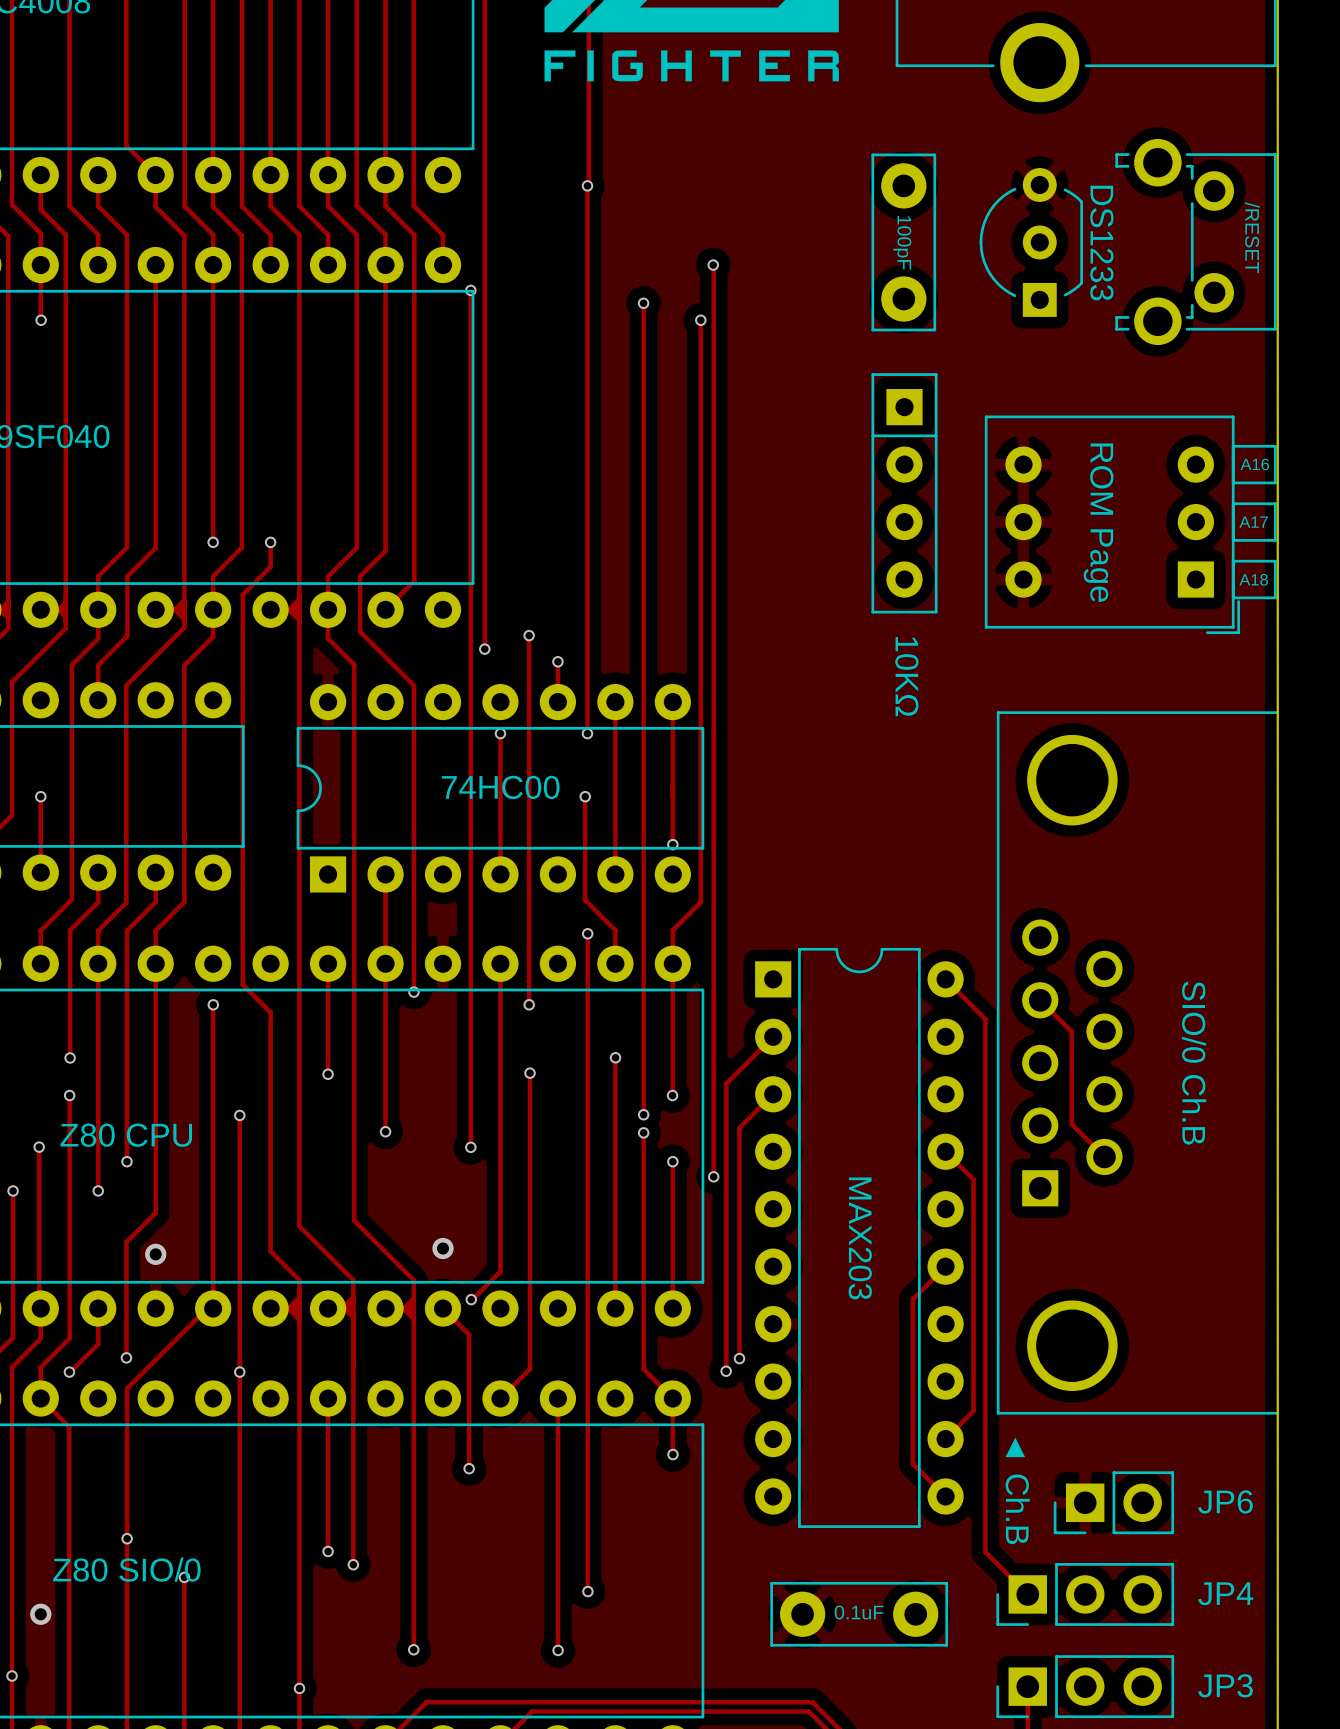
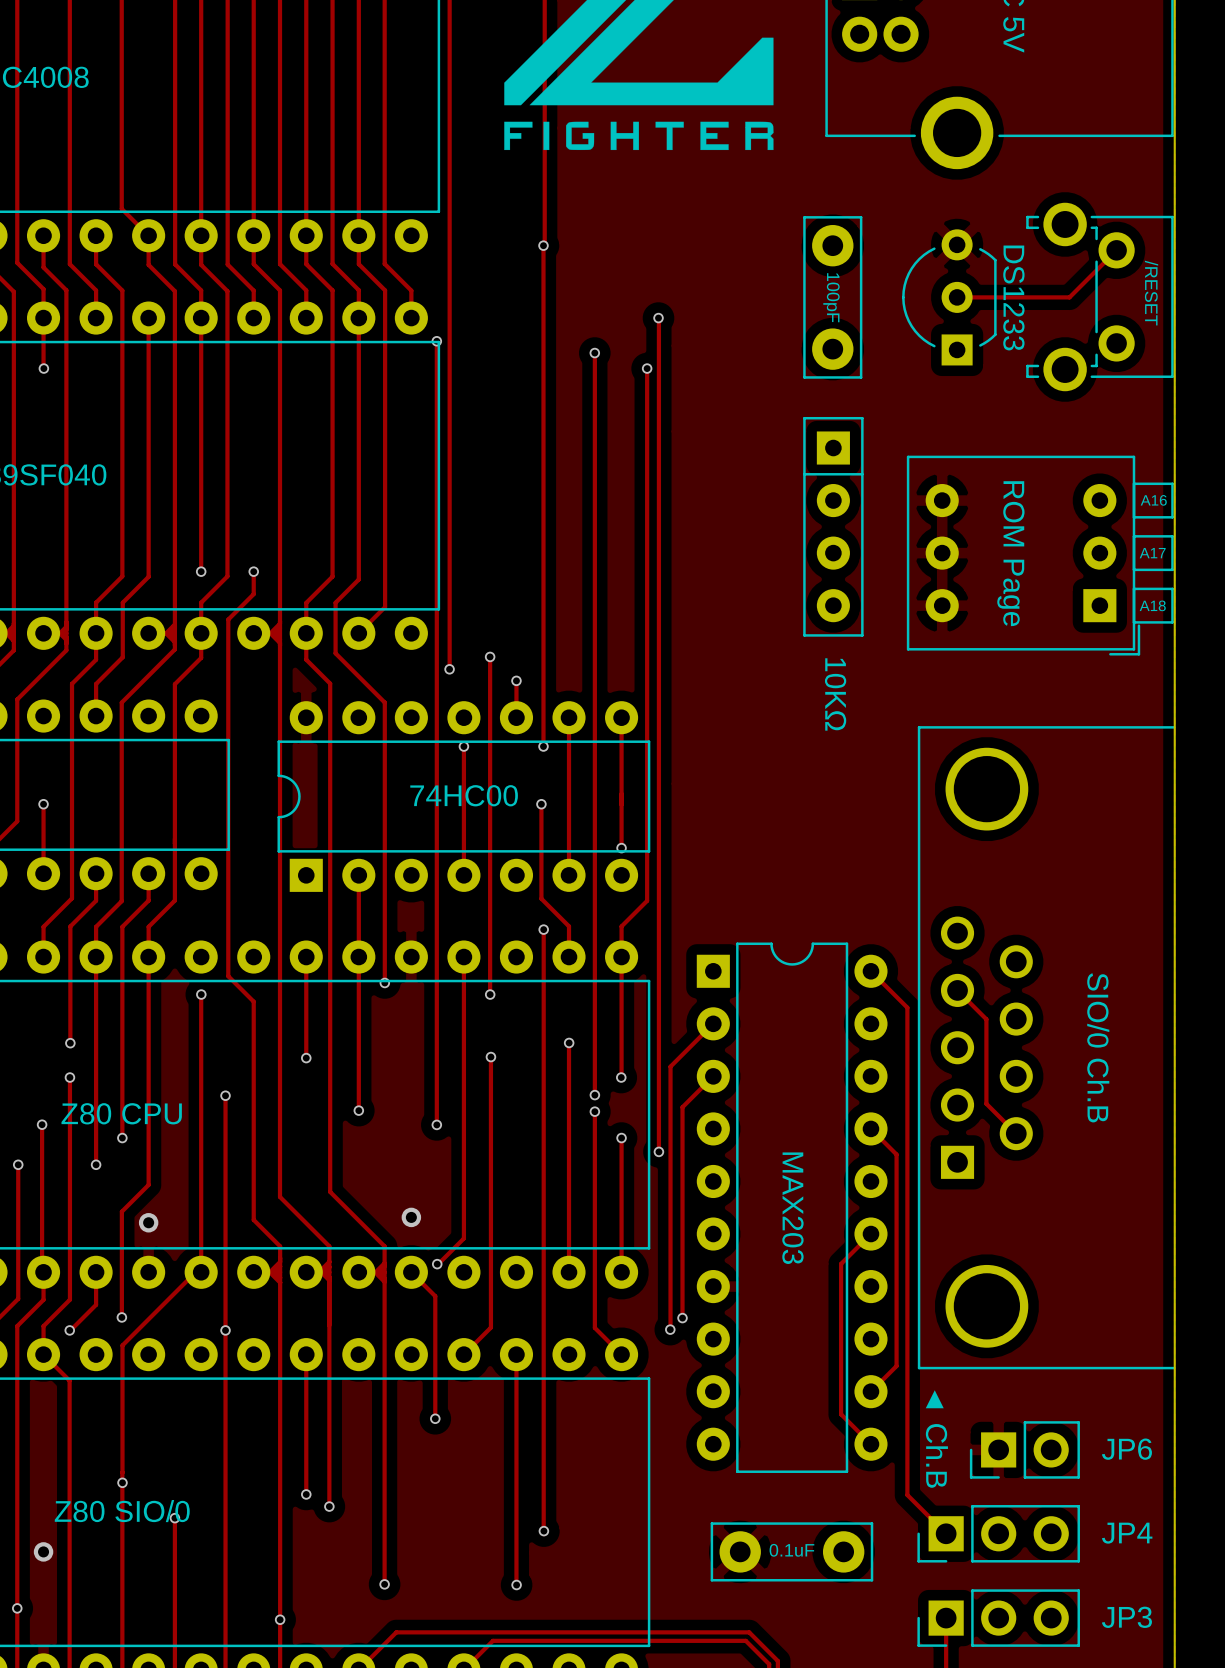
track: none -> (1116, 250) (1069, 297) (964, 297)
track: (672, 1398) (672, 1453) -> none
via: (672, 1454) -> none

